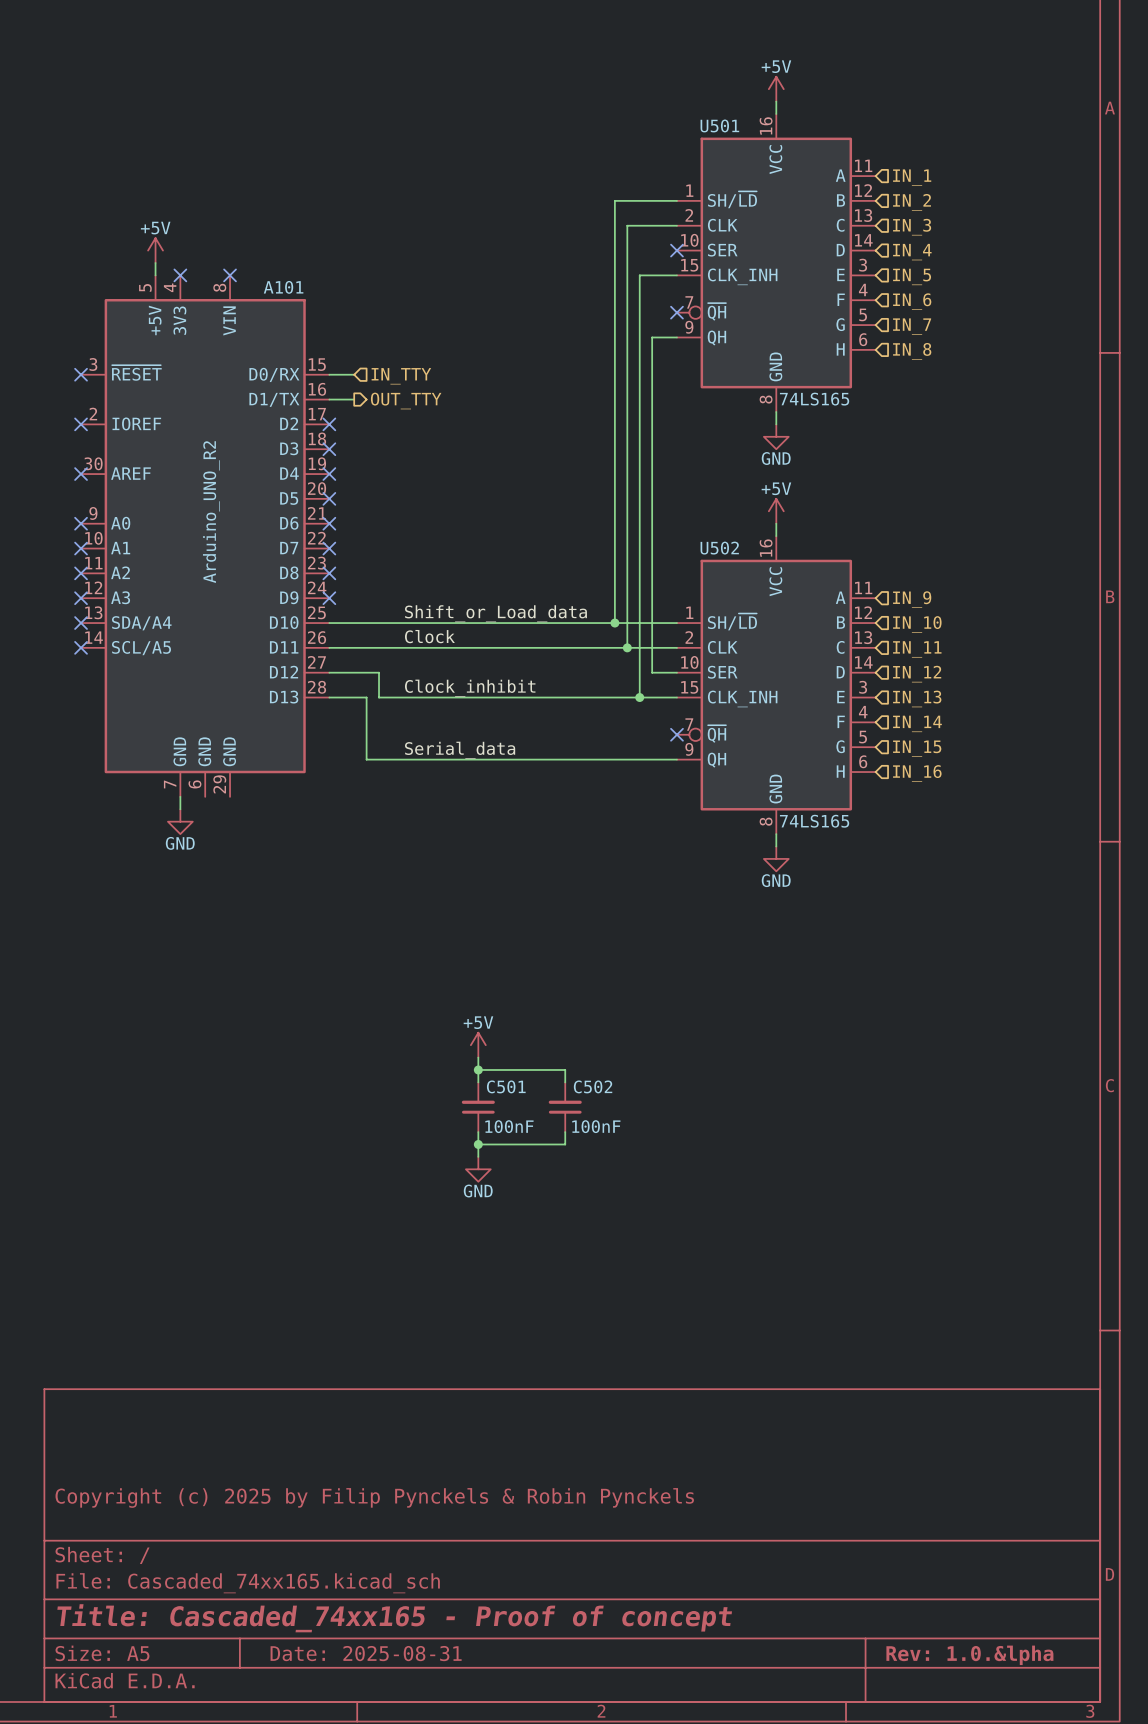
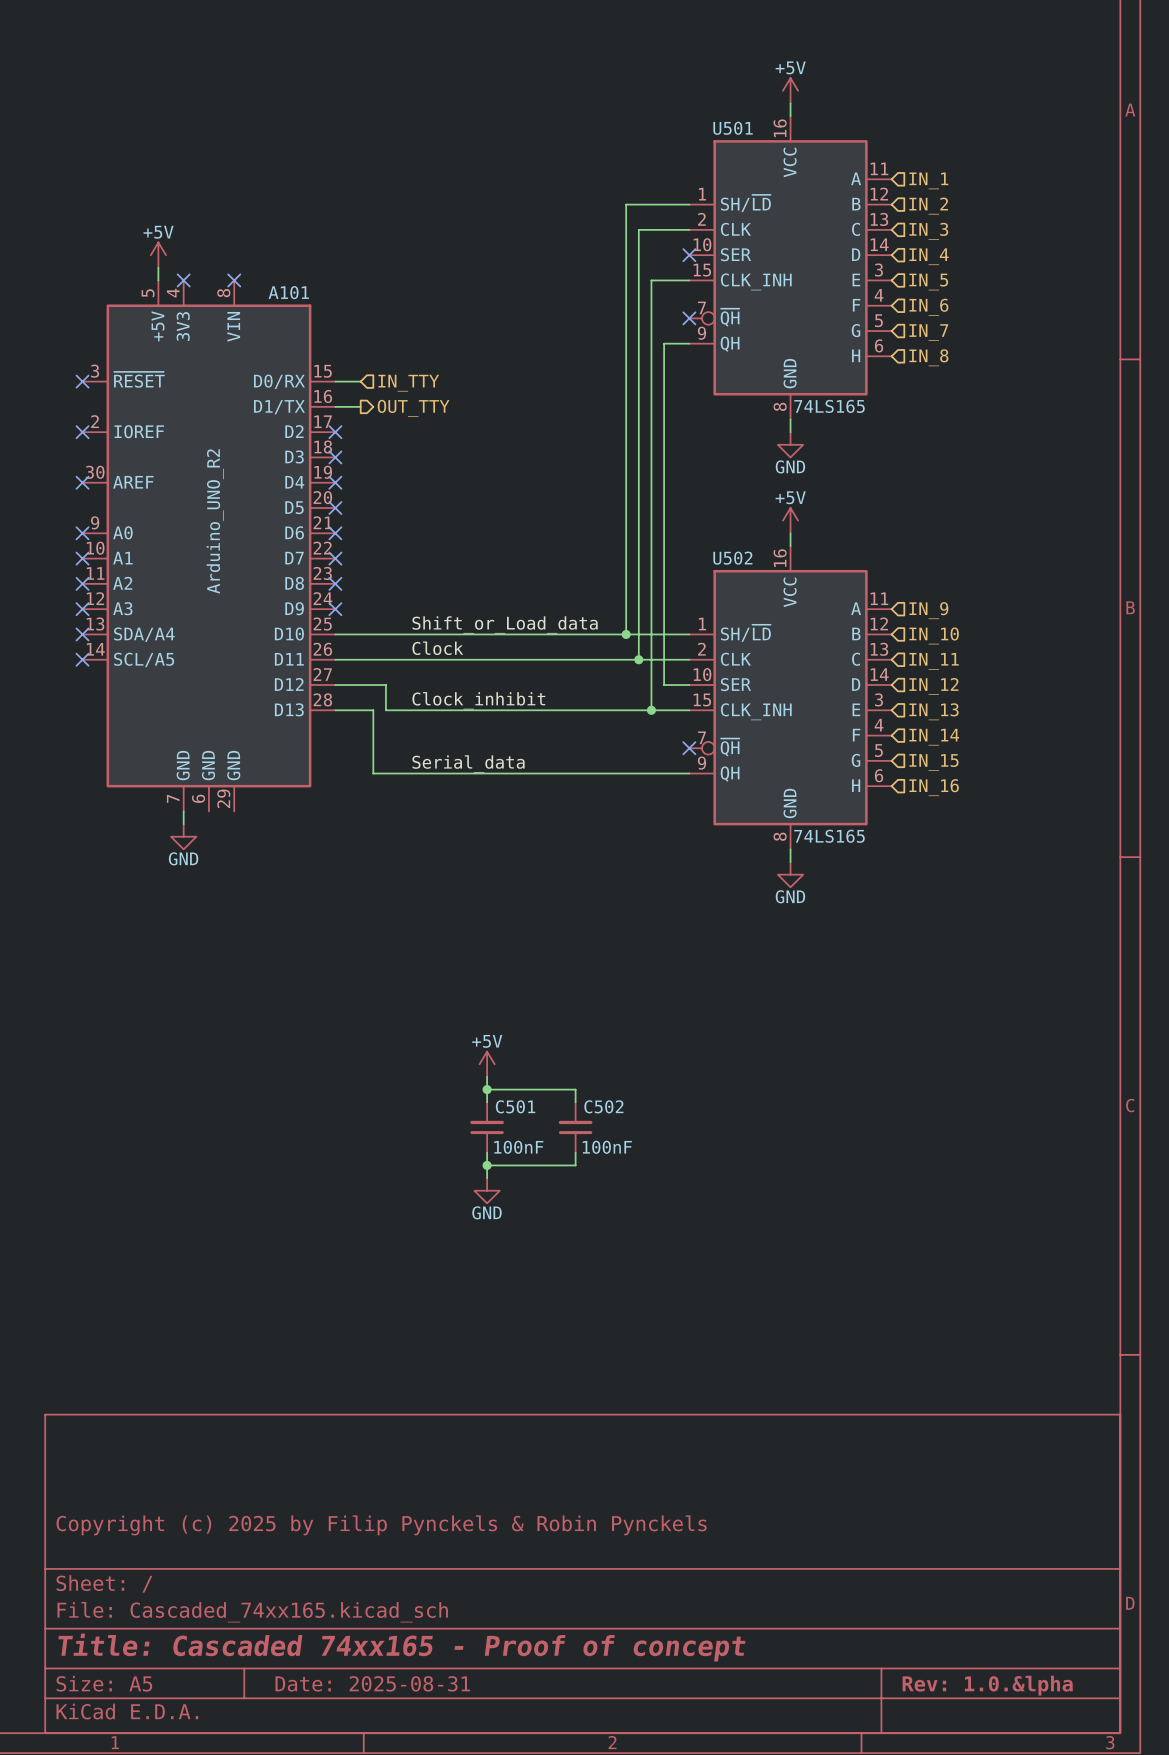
title block: Title: Cascaded_74xx165 - Proof of concept (394, 1618) -> Title: Cascaded 74xx165 - Proof of concept (401, 1647)

